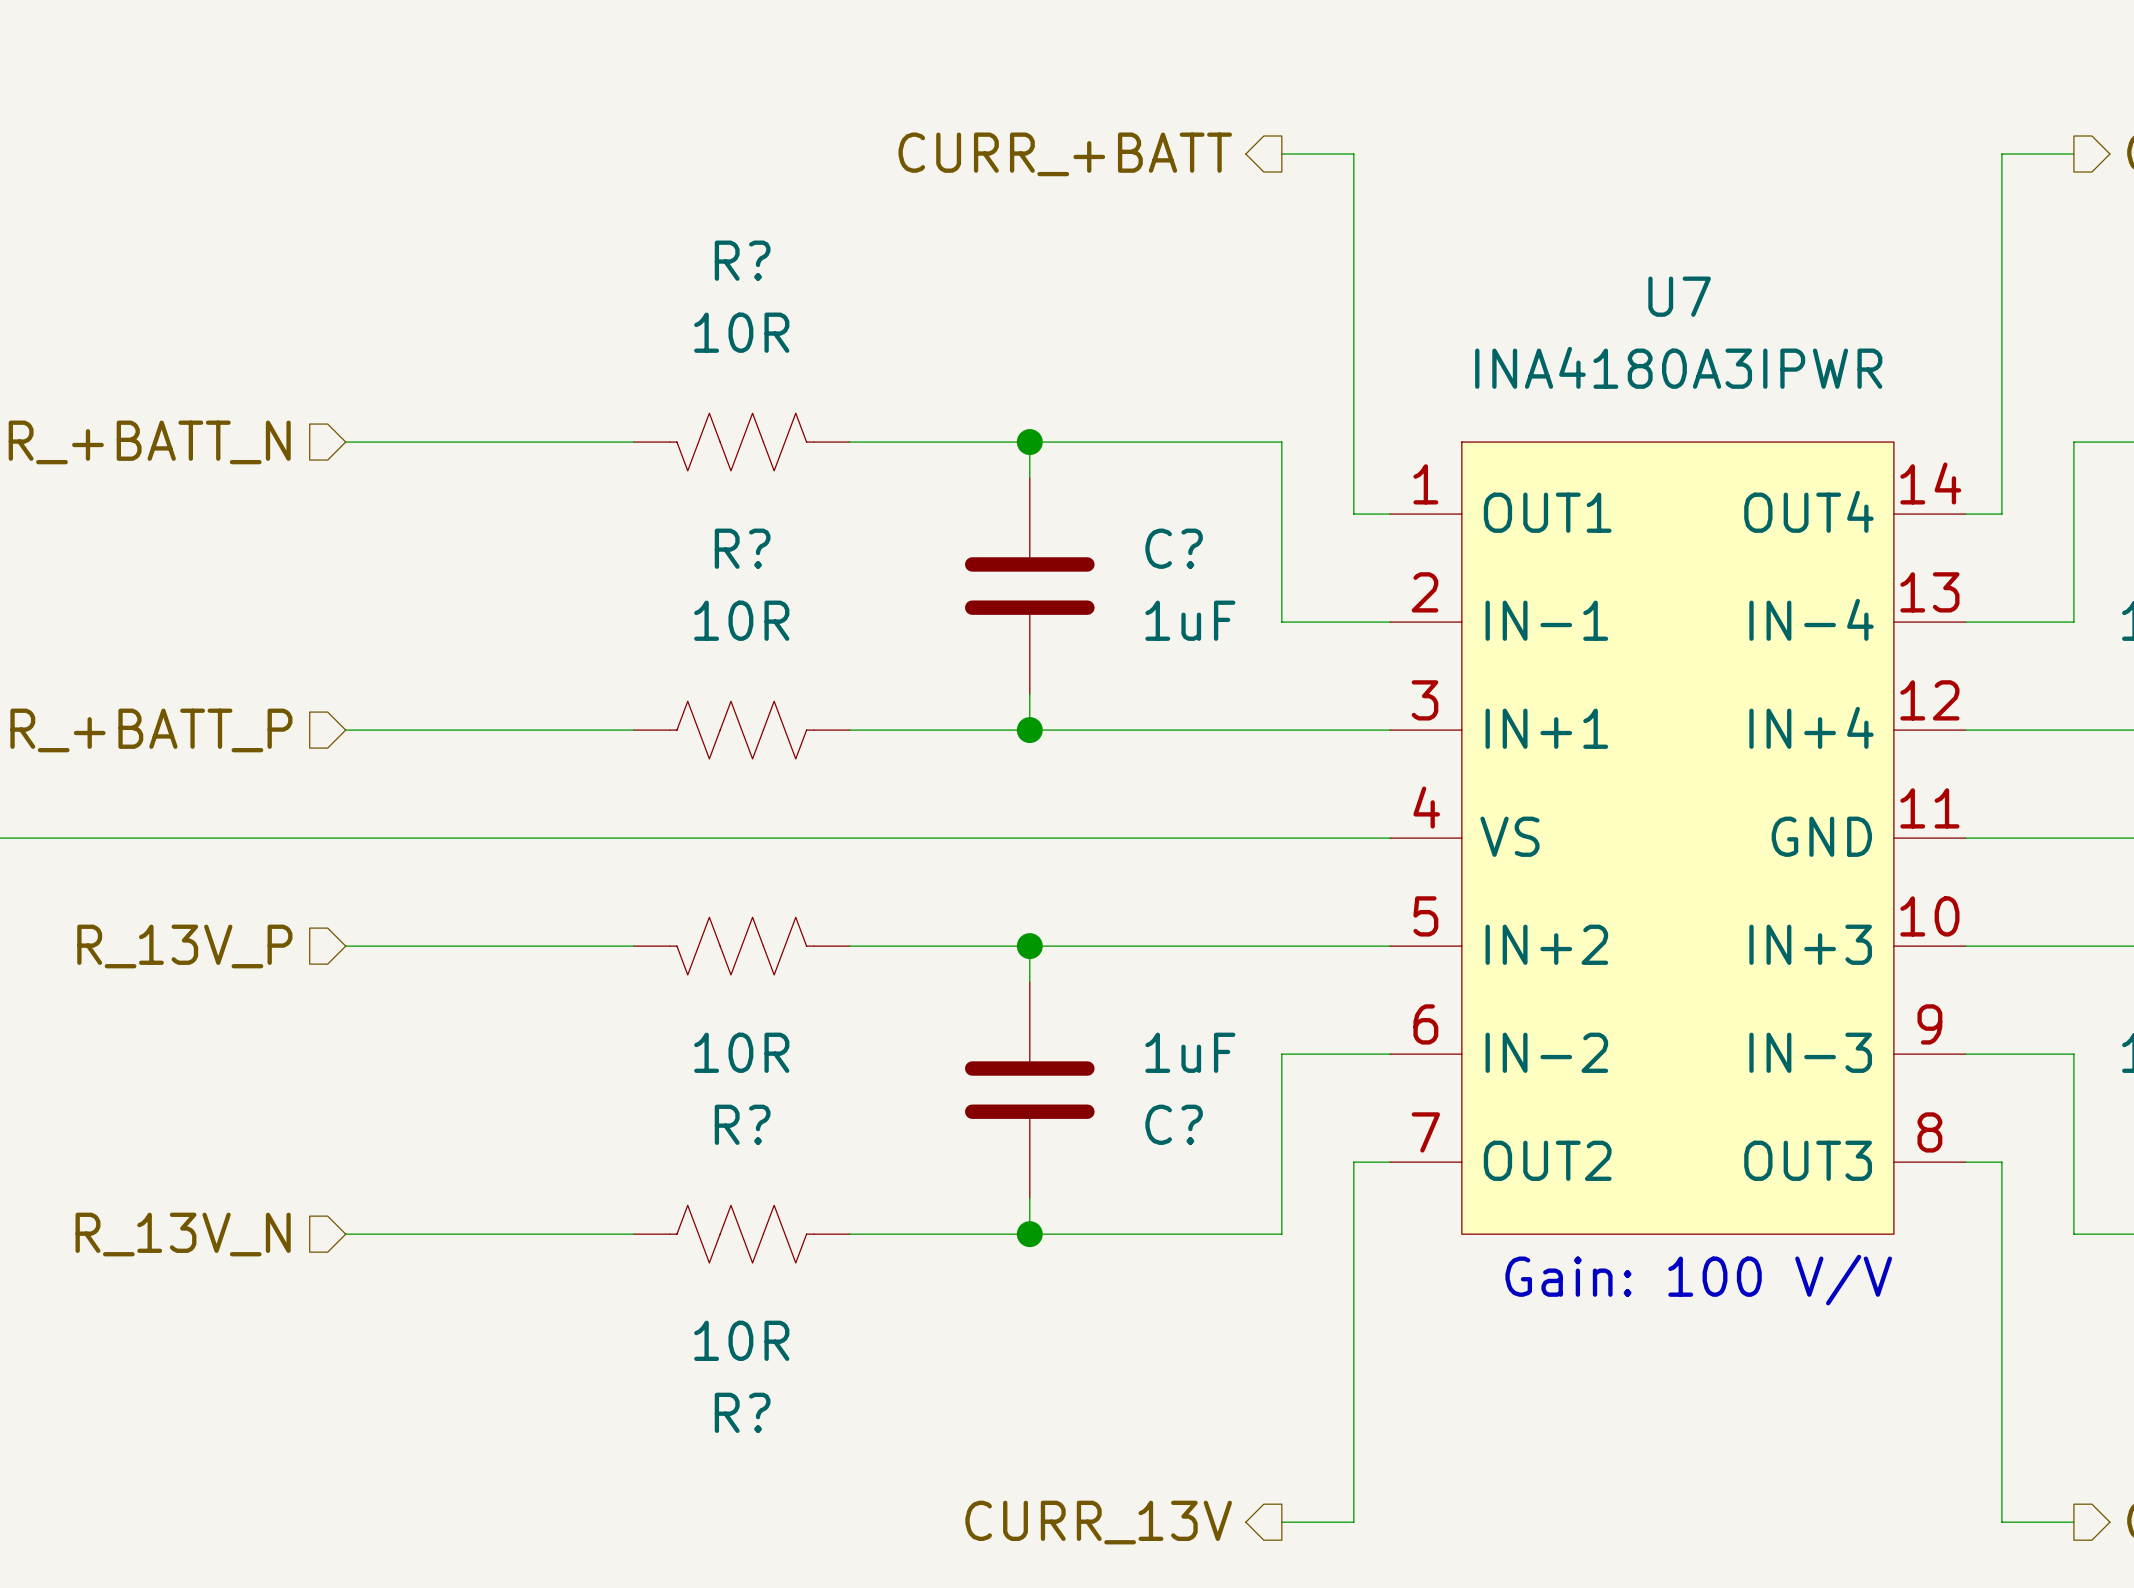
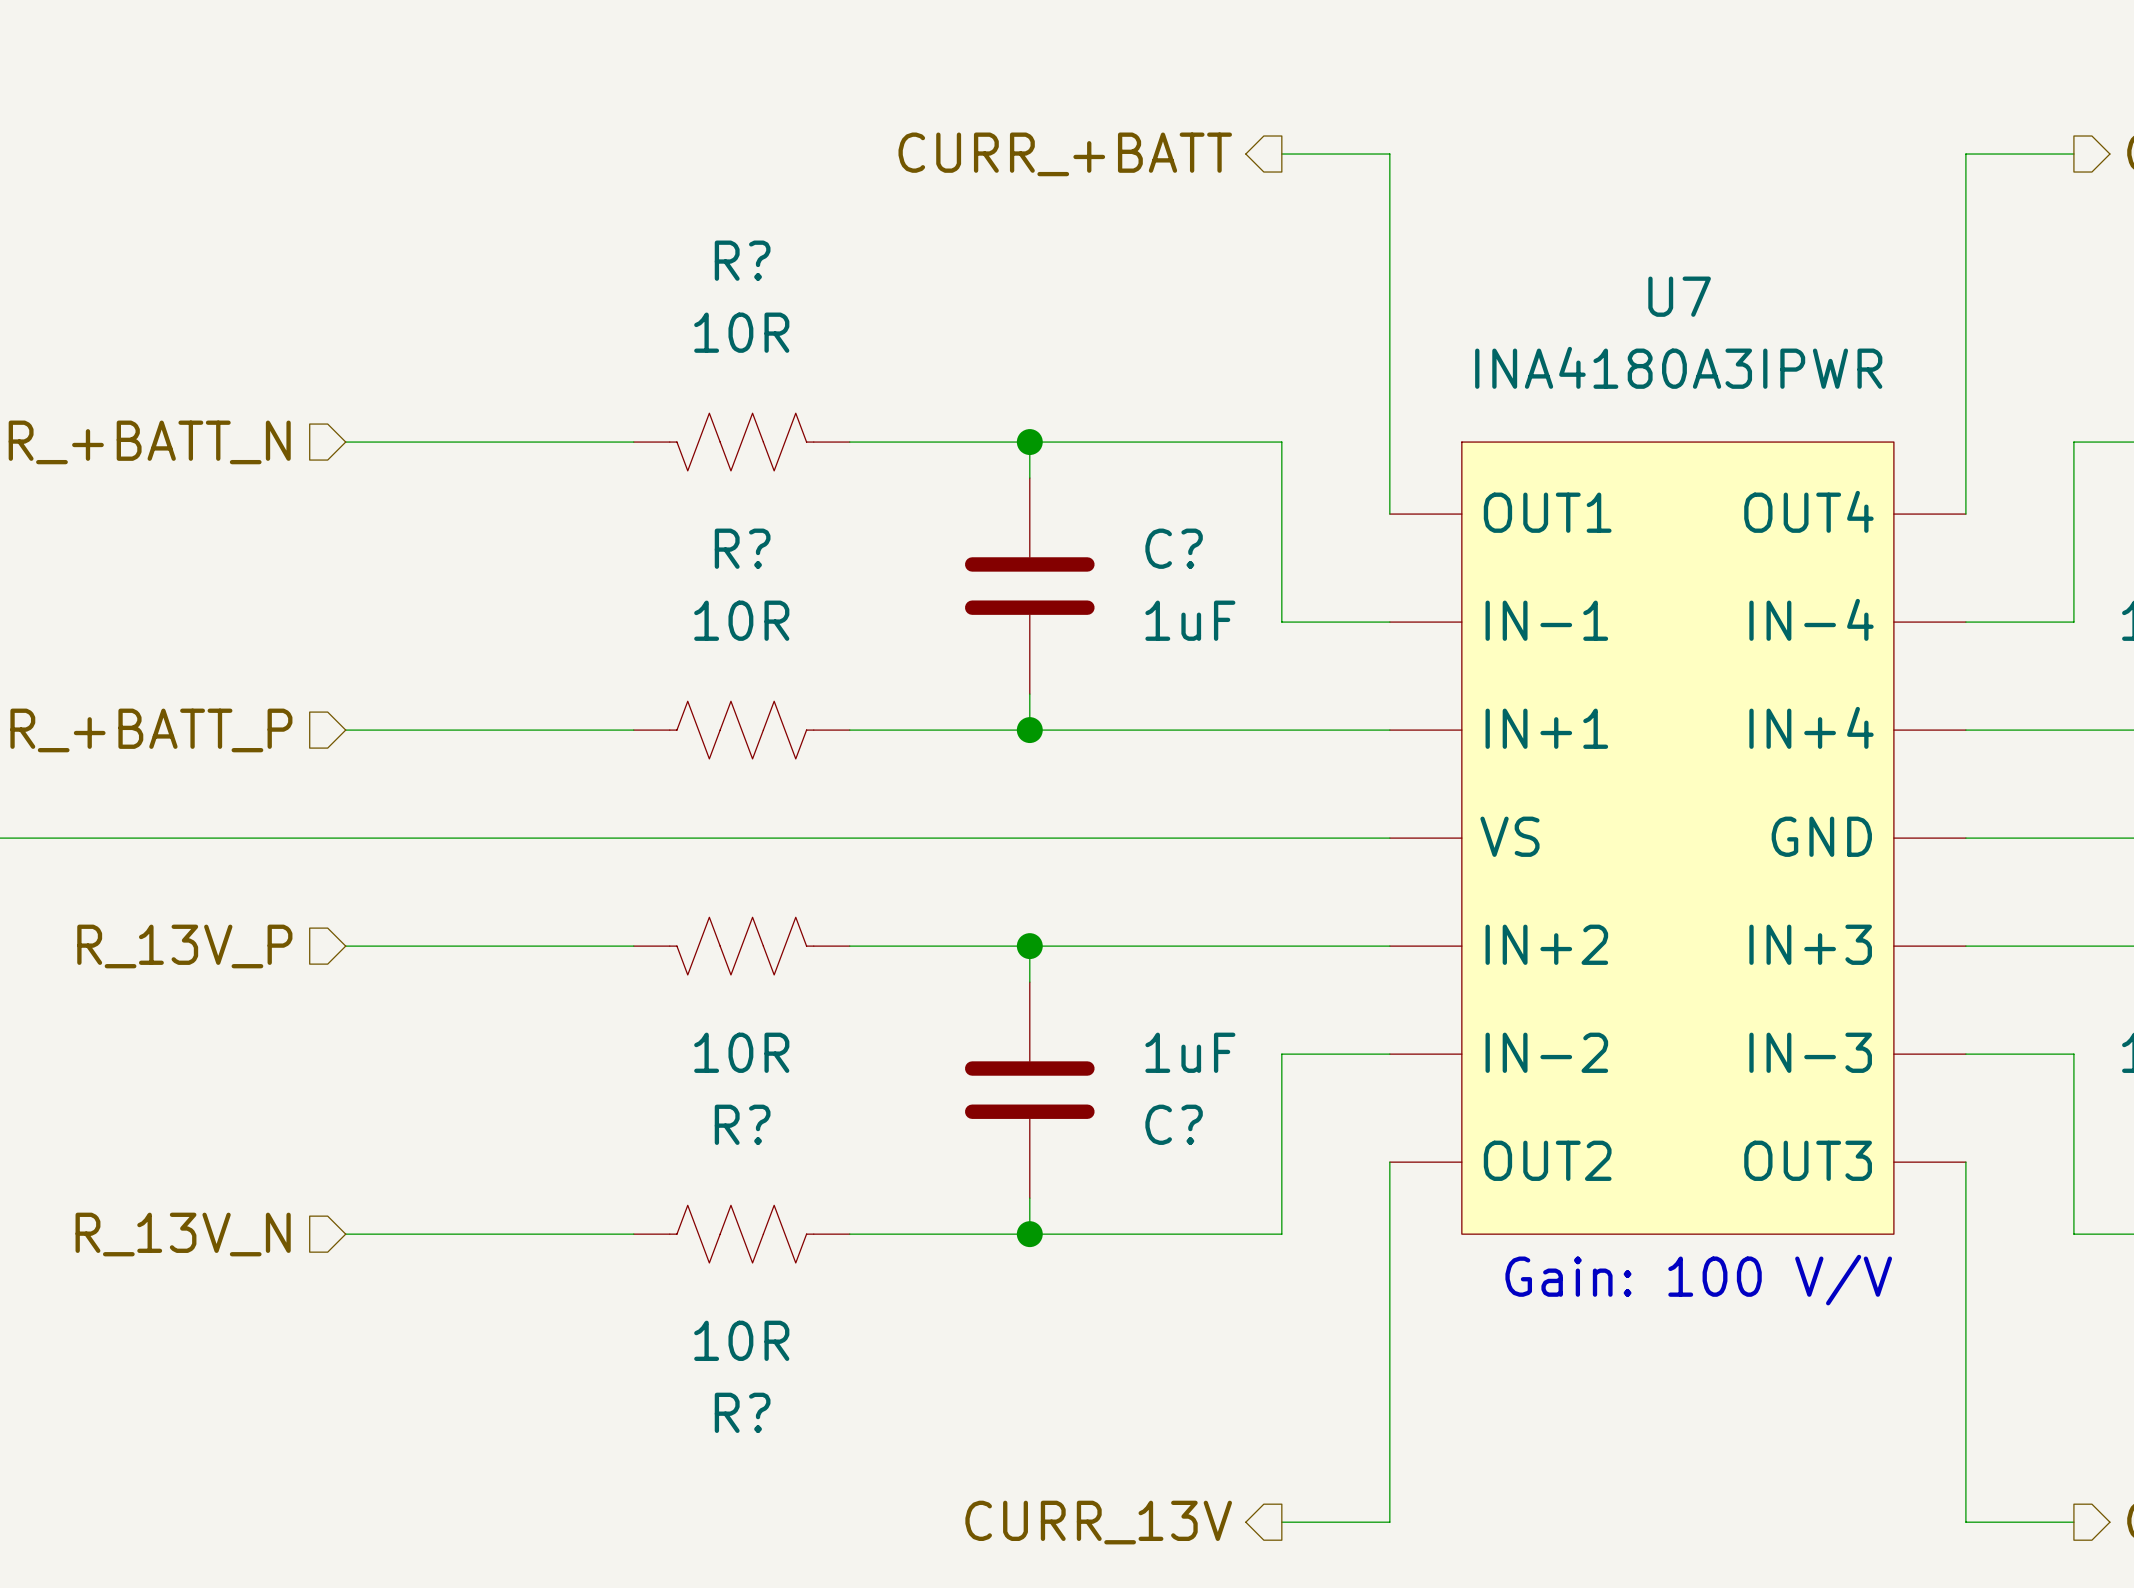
wire: (1353, 154) (1353, 514) (1389, 514) -> (1353, 154) (1389, 154) (1389, 514)
wire: (2001, 154) (2001, 514) (1965, 514) -> (2001, 154) (1965, 154) (1965, 514)
U7 symbol: [1389, 442, 1966, 1235] -> [1389, 442, 1966, 1235]
wire: (1389, 1162) (1353, 1162) (1353, 1522) -> (1389, 1162) (1389, 1522) (1353, 1522)
wire: (1965, 1162) (2001, 1162) (2001, 1522) -> (1965, 1162) (1965, 1522) (2001, 1522)

